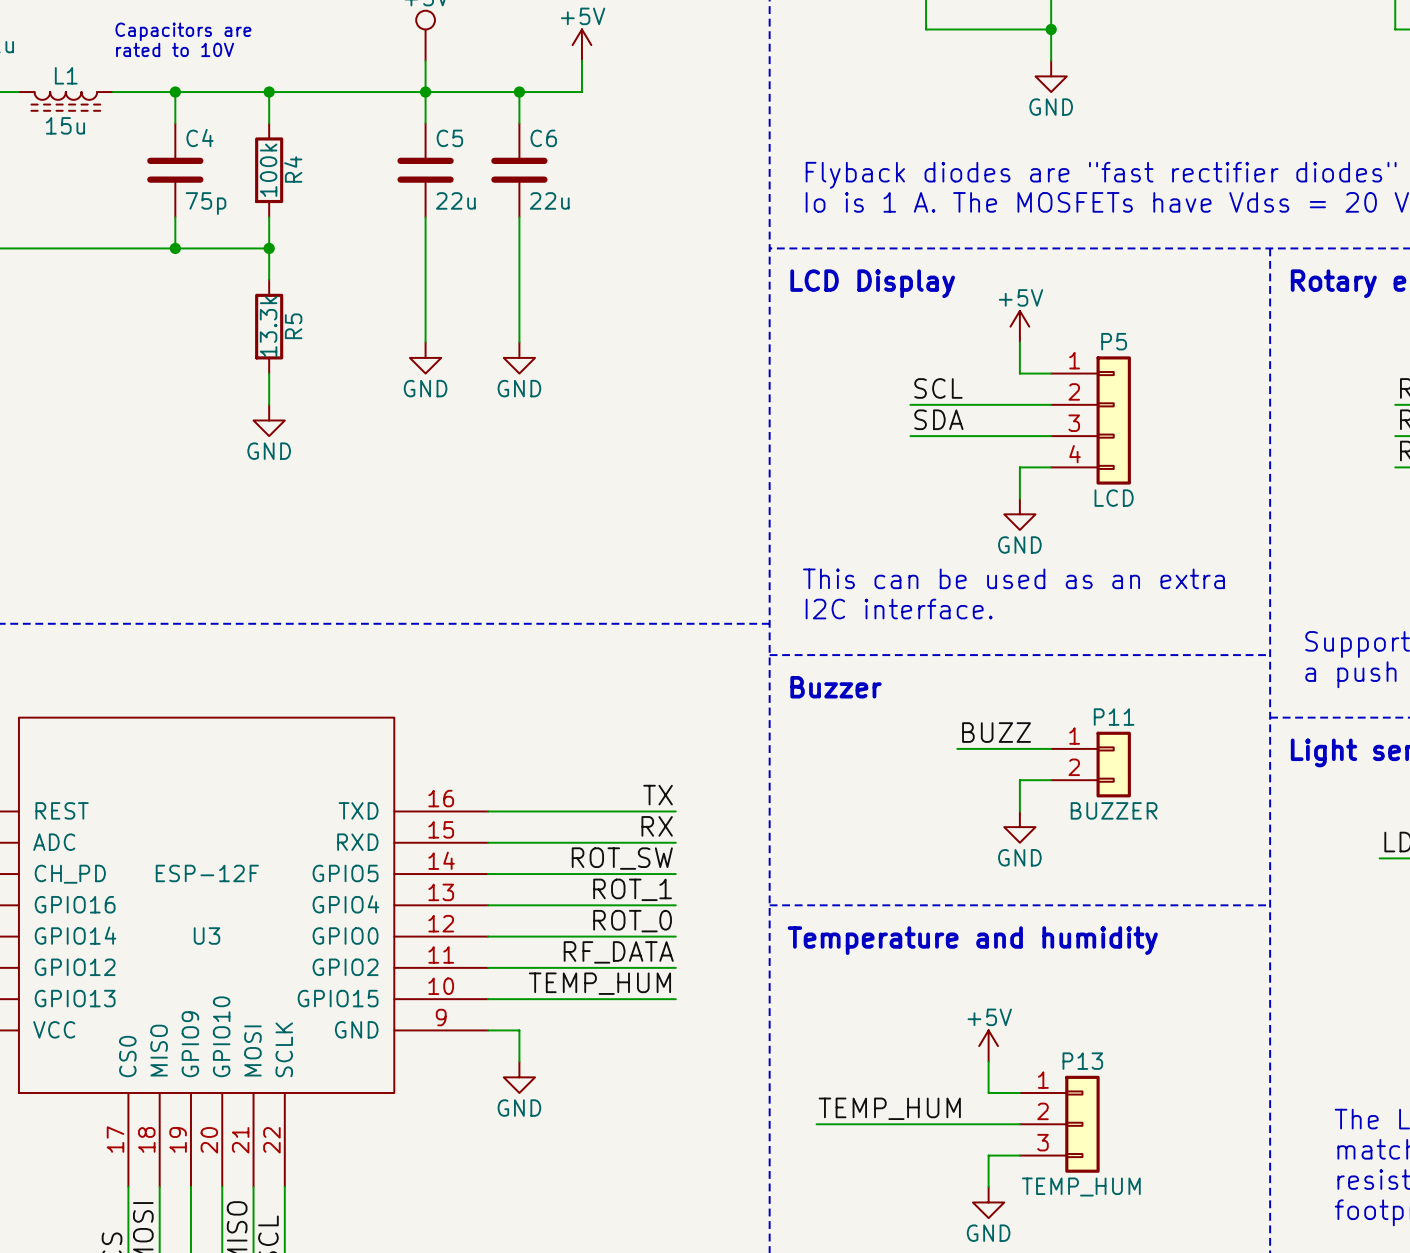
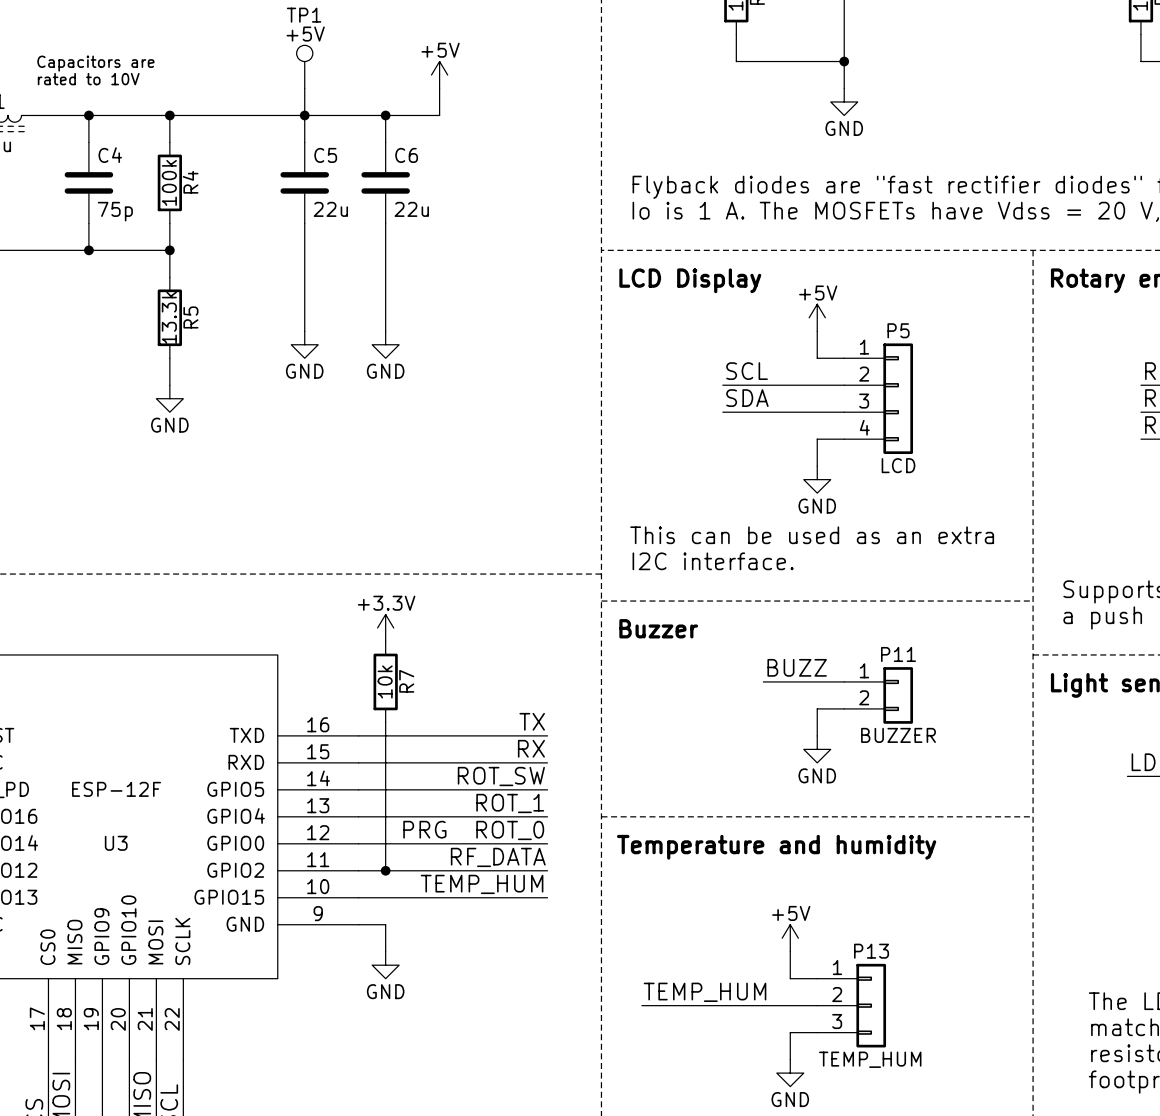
power symbol: none -> +3.3V (385, 628)
R7: none -> 10k (385, 681)
wire: none -> (385, 722) (385, 870)
label position: TX (658, 795) -> TX (532, 721)
wire: none -> (520, 735) (547, 735)
label position: RX (657, 826) -> RX (531, 748)
wire: none -> (520, 762) (547, 762)
label position: ROT_SW (622, 858) -> ROT_SW (501, 776)
wire: none -> (520, 789) (547, 789)
label position: ROT_1 (632, 889) -> ROT_1 (510, 803)
wire: none -> (520, 816) (547, 816)
label: none -> PRG (424, 829)
label position: ROT_0 (632, 921) -> ROT_0 (510, 830)
wire: none -> (520, 843) (547, 843)
label position: RF_DATA (618, 952) -> RF_DATA (498, 857)
junction: none -> (385, 870)
wire: none -> (520, 870) (547, 870)
label position: TEMP_HUM (599, 983) -> TEMP_HUM (482, 884)
wire: none -> (520, 897) (547, 897)

